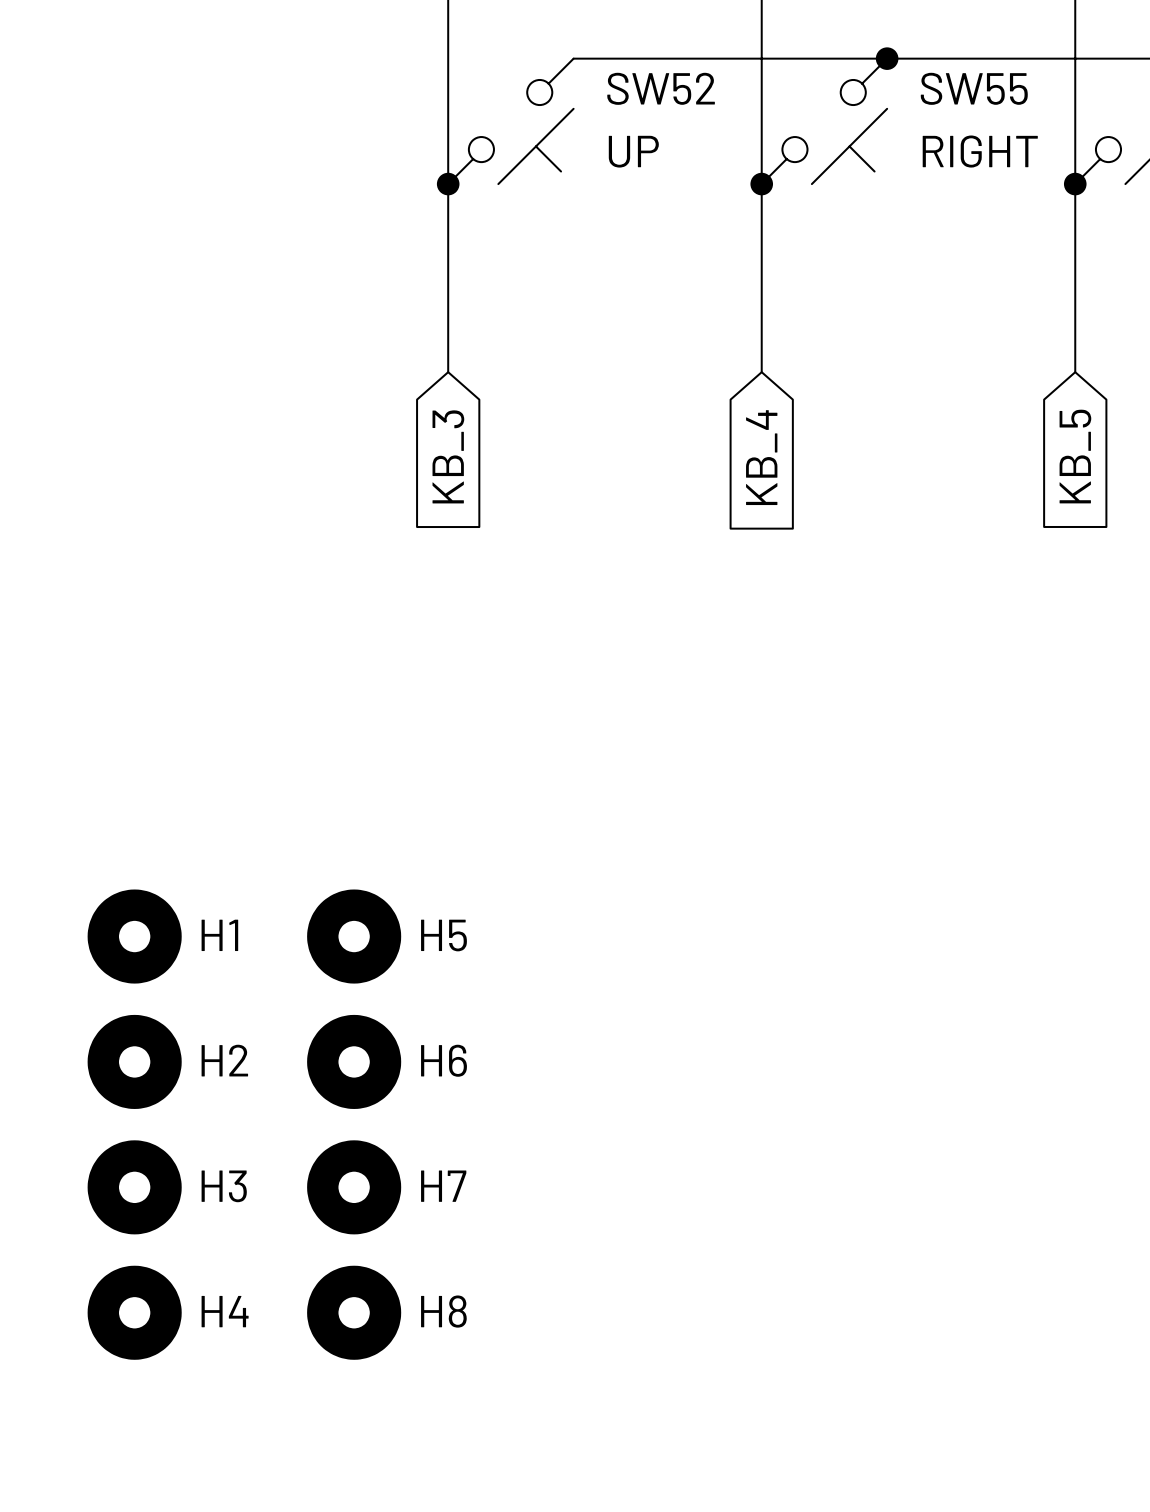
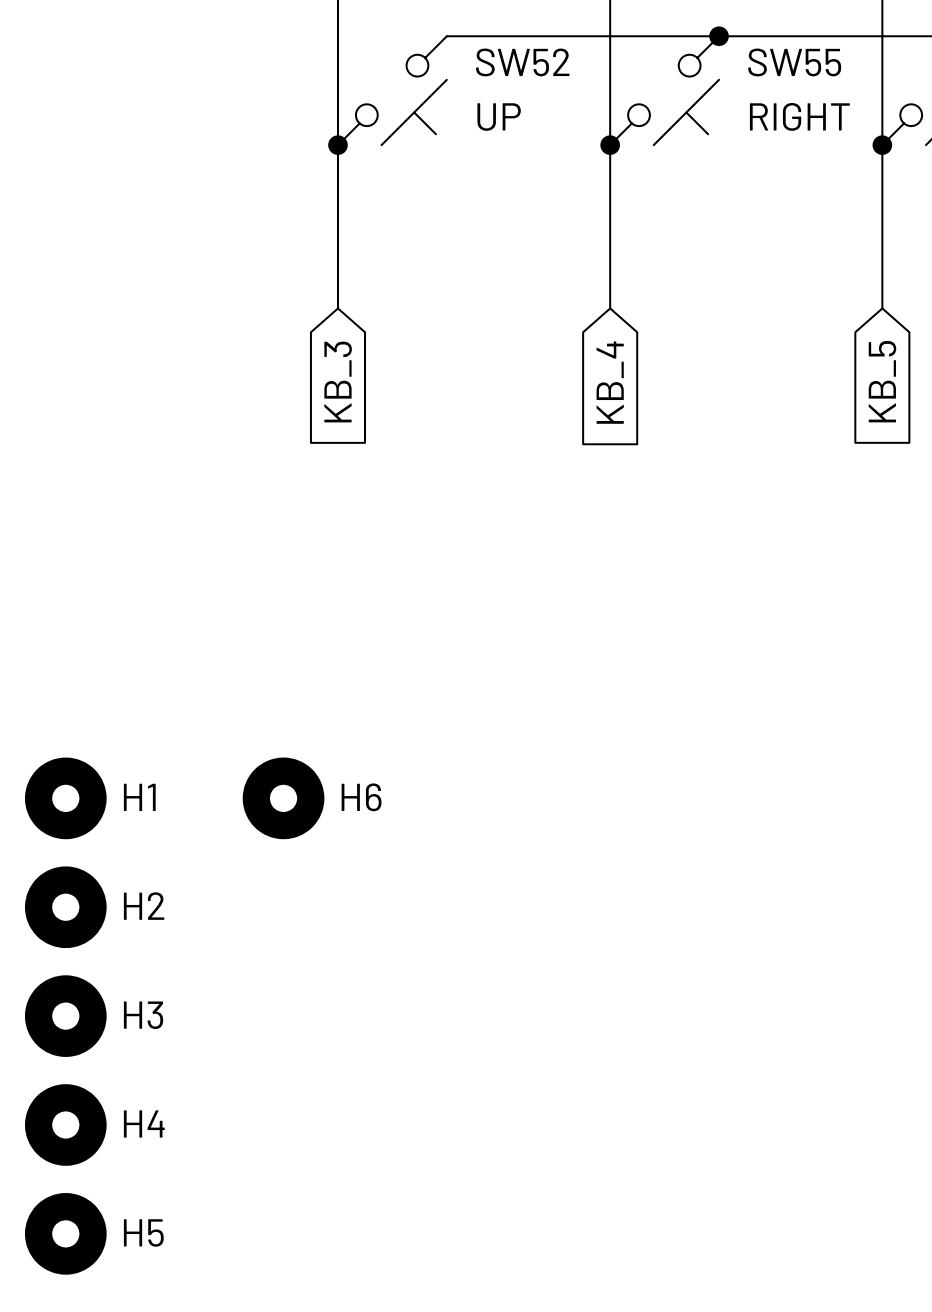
H5 position: (354, 936) -> (65, 1233)
H6 position: (354, 1061) -> (283, 798)
H7: (354, 1187) -> none
H8: (354, 1312) -> none

